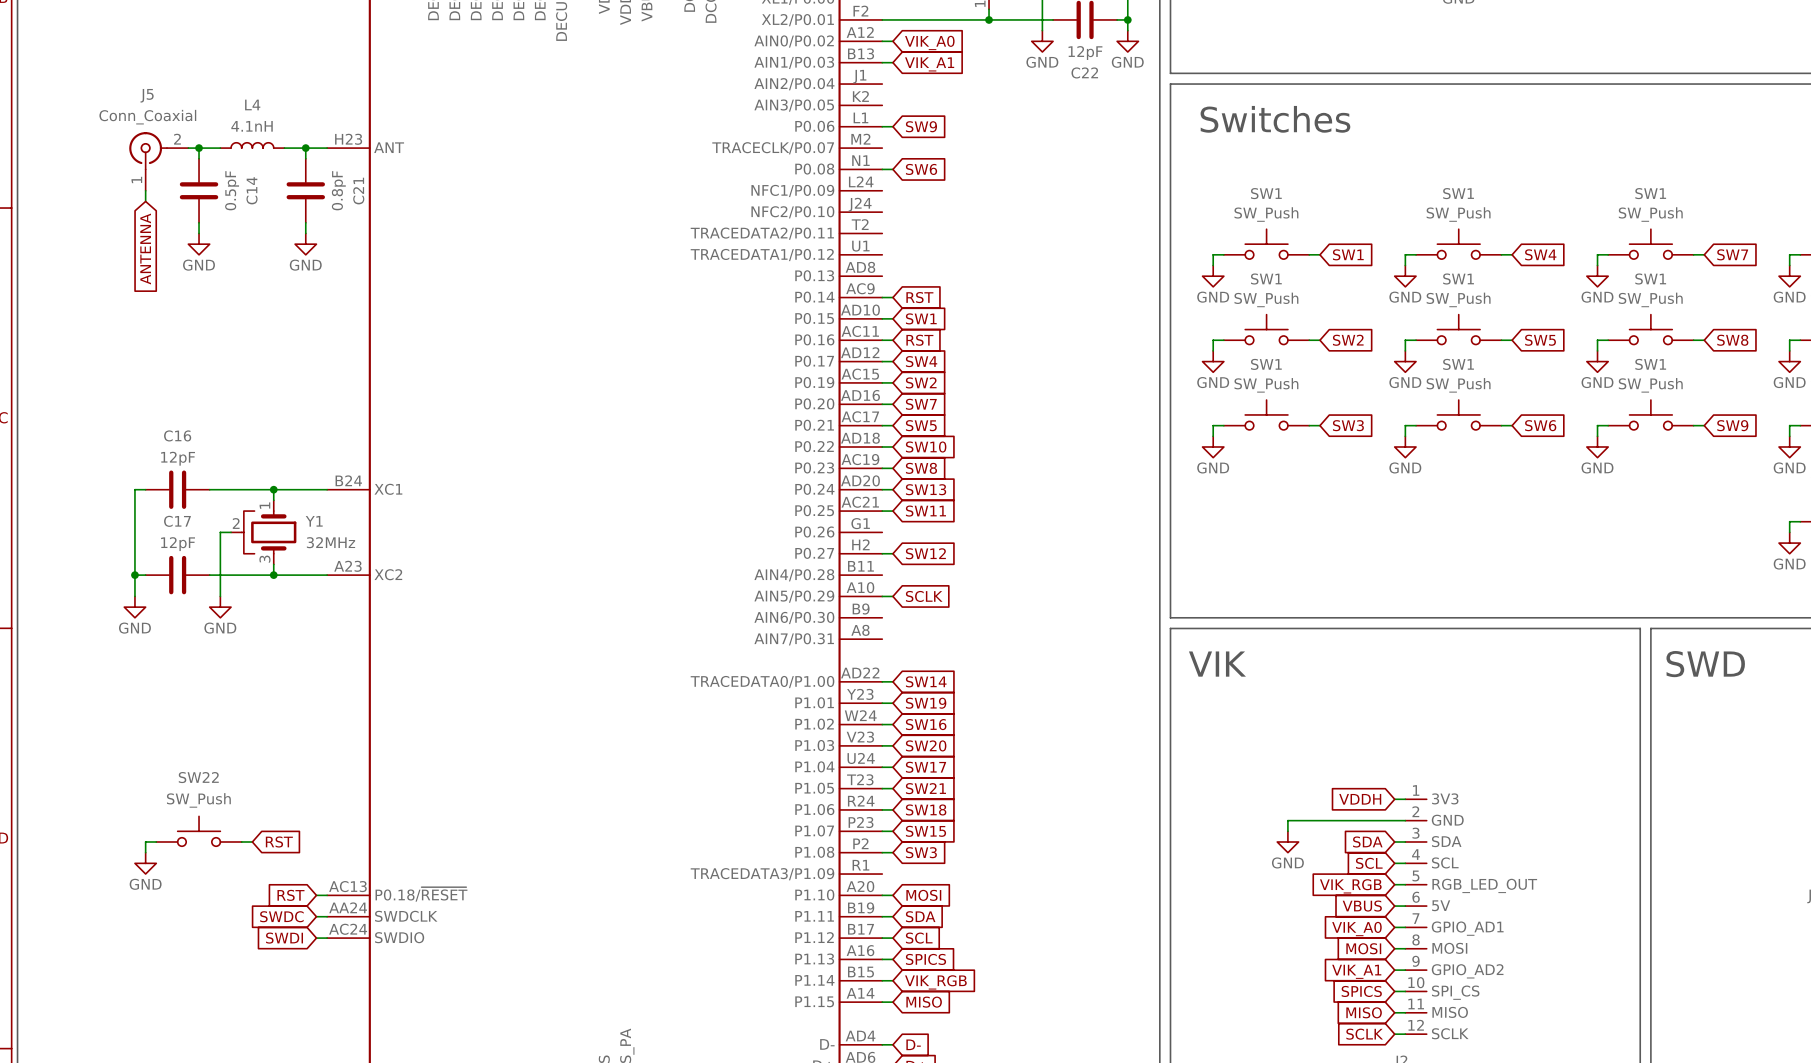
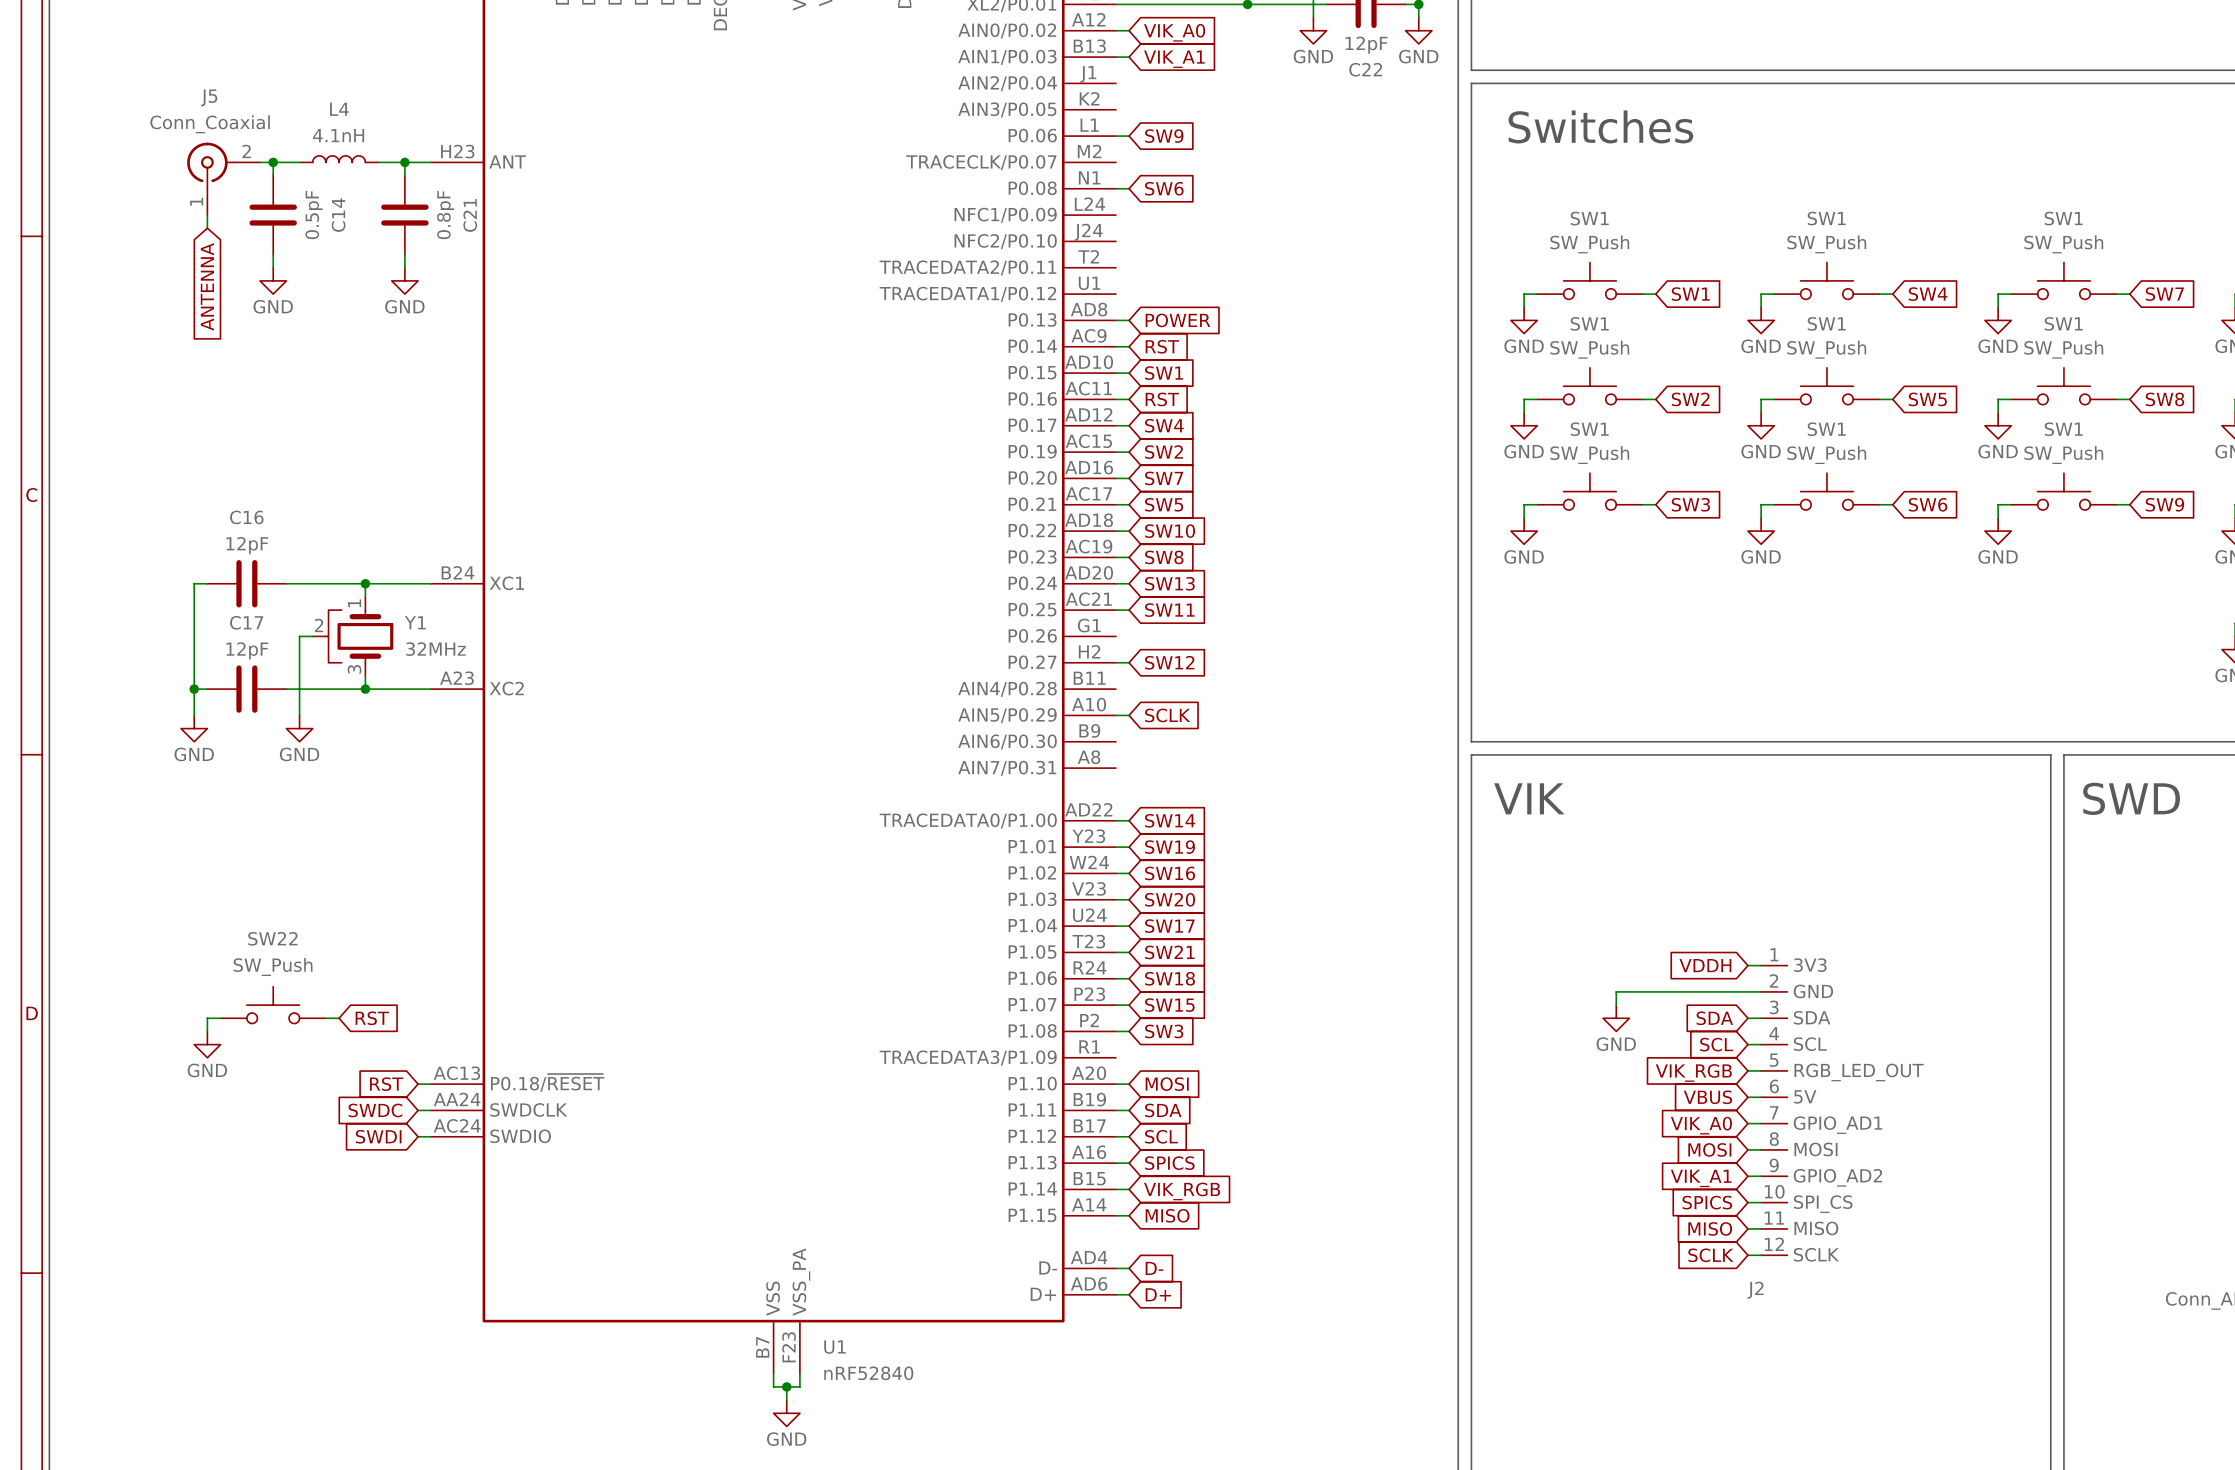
wire: none -> (1115, 320) (1129, 320)
global label: none -> POWER (1177, 320)

